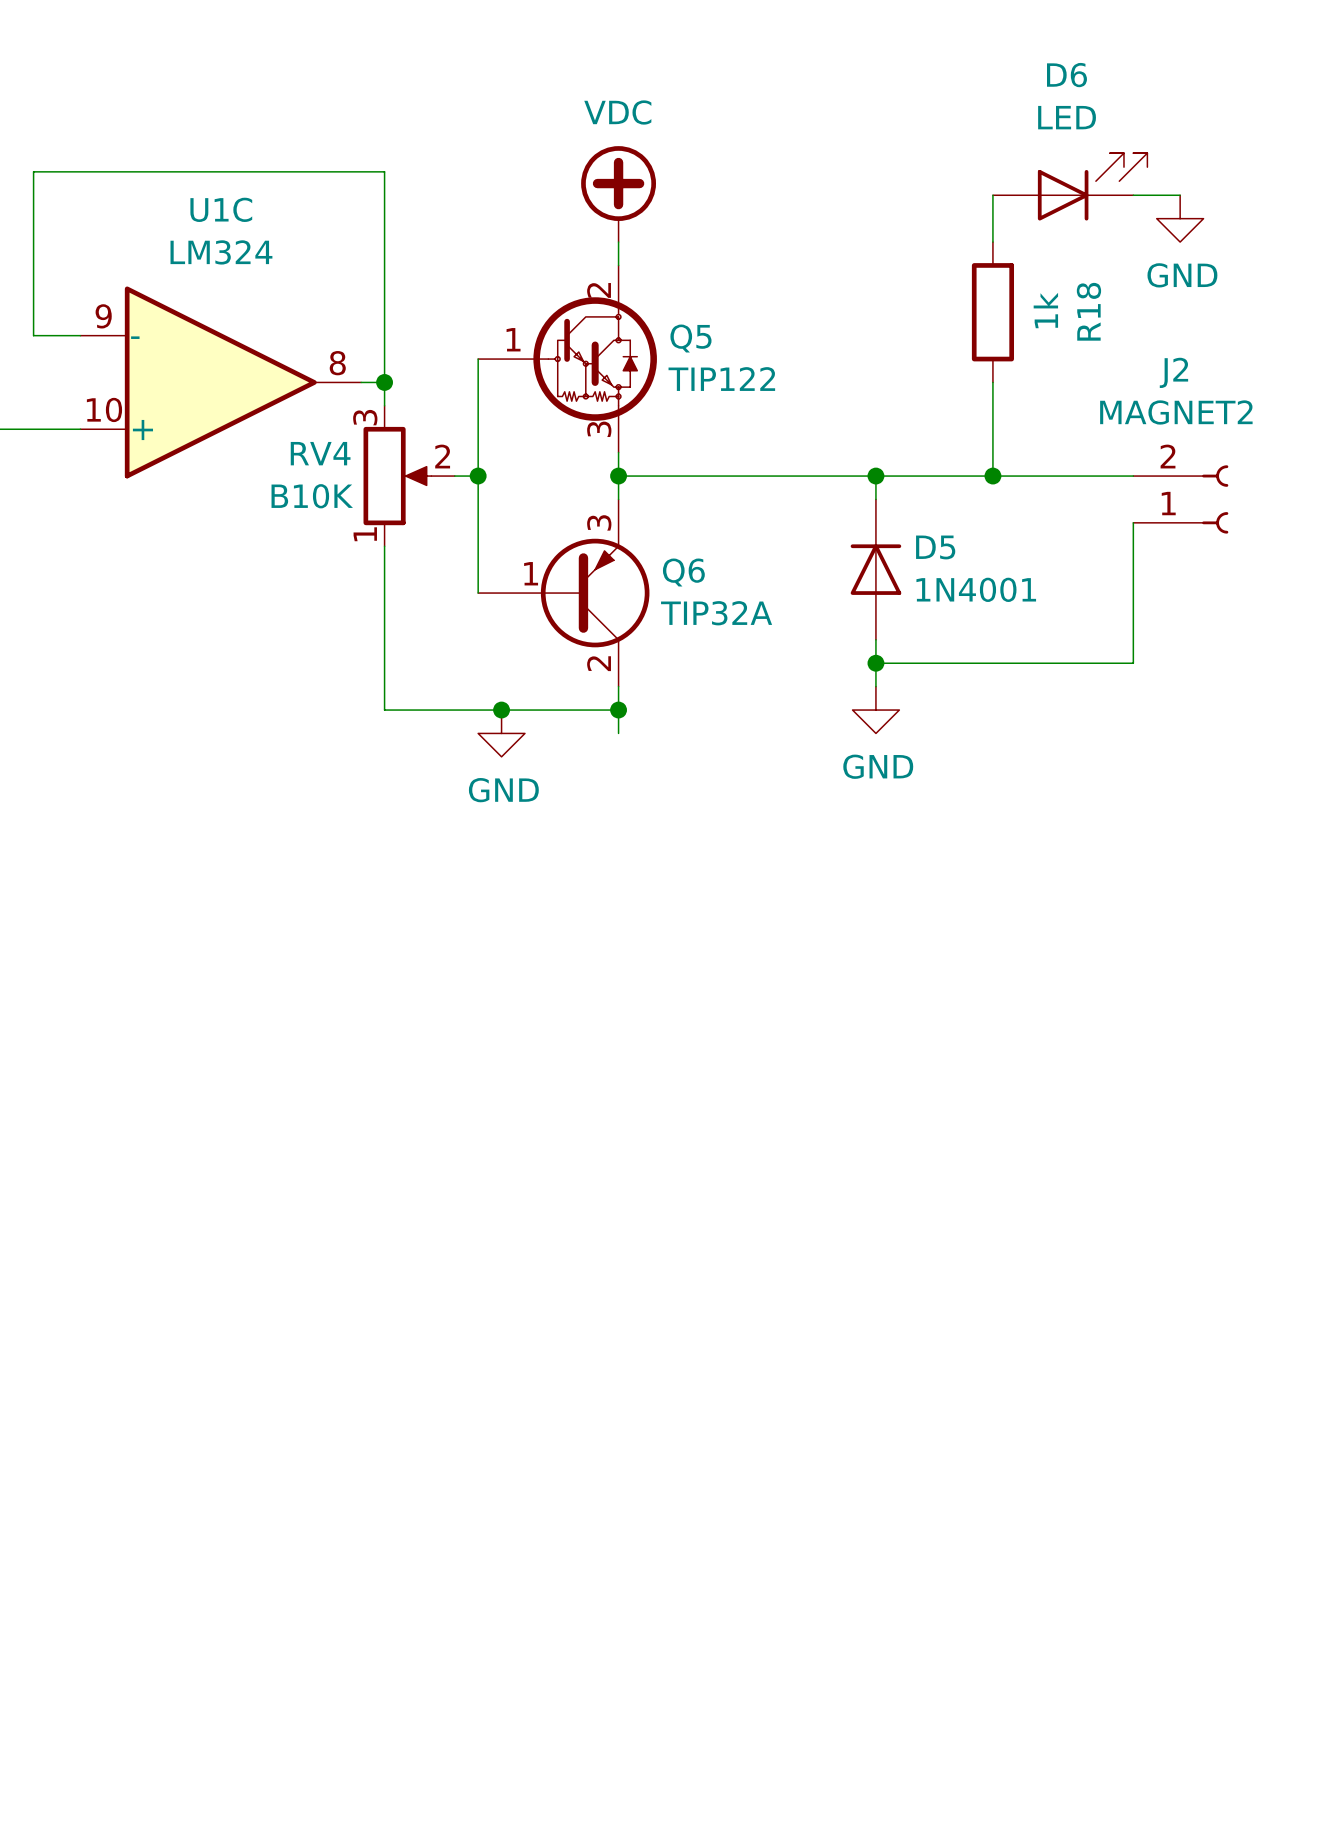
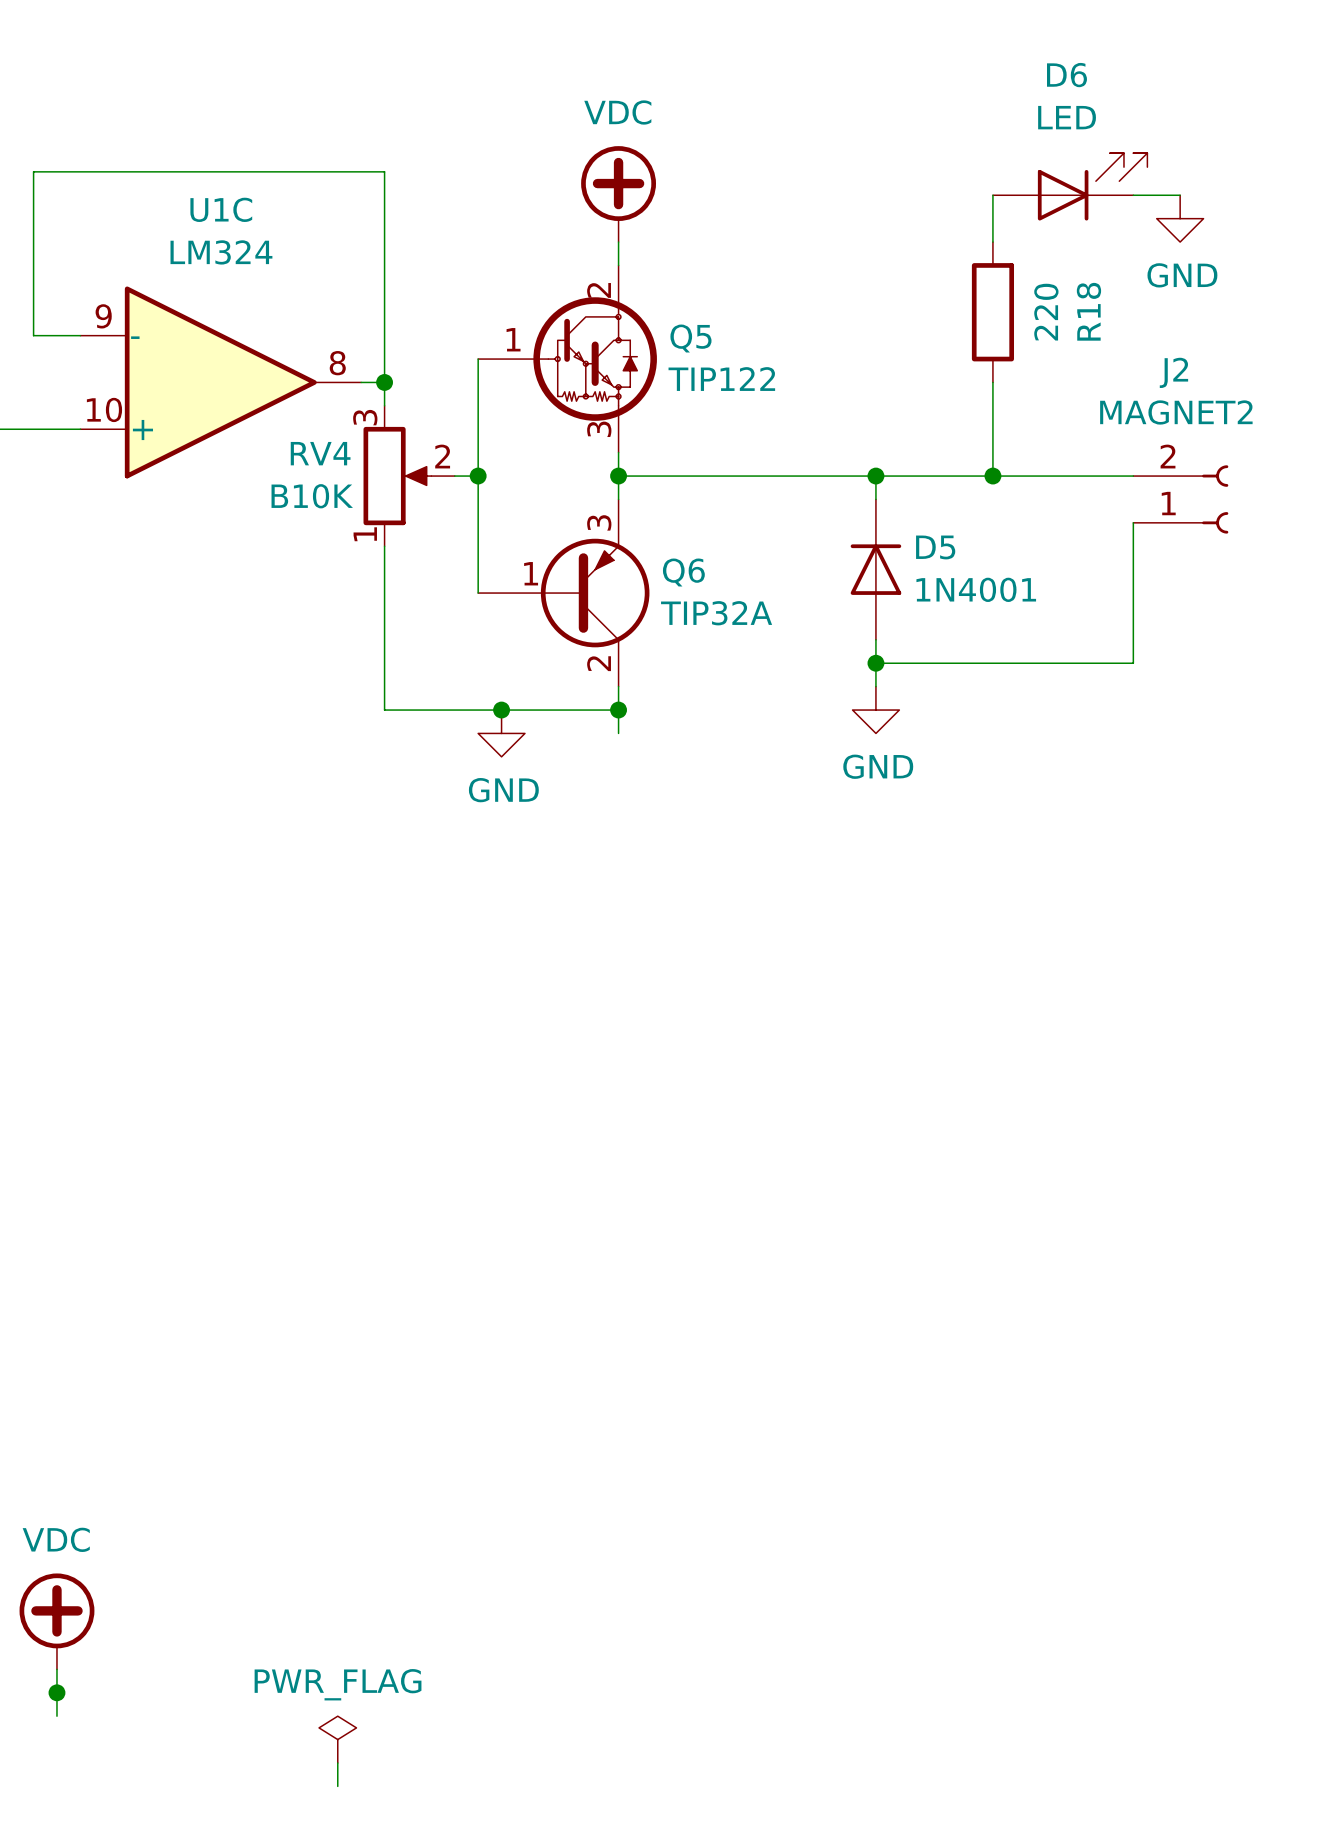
R18 value: 1k (1045, 310) -> 220 (1046, 312)
power symbol: none -> VDC (56, 1621)
wire: none -> (56, 1669) (56, 1716)
junction: none -> (56, 1692)
power symbol: none -> PWR_FLAG (337, 1739)
wire: none -> (337, 1762) (337, 1786)

